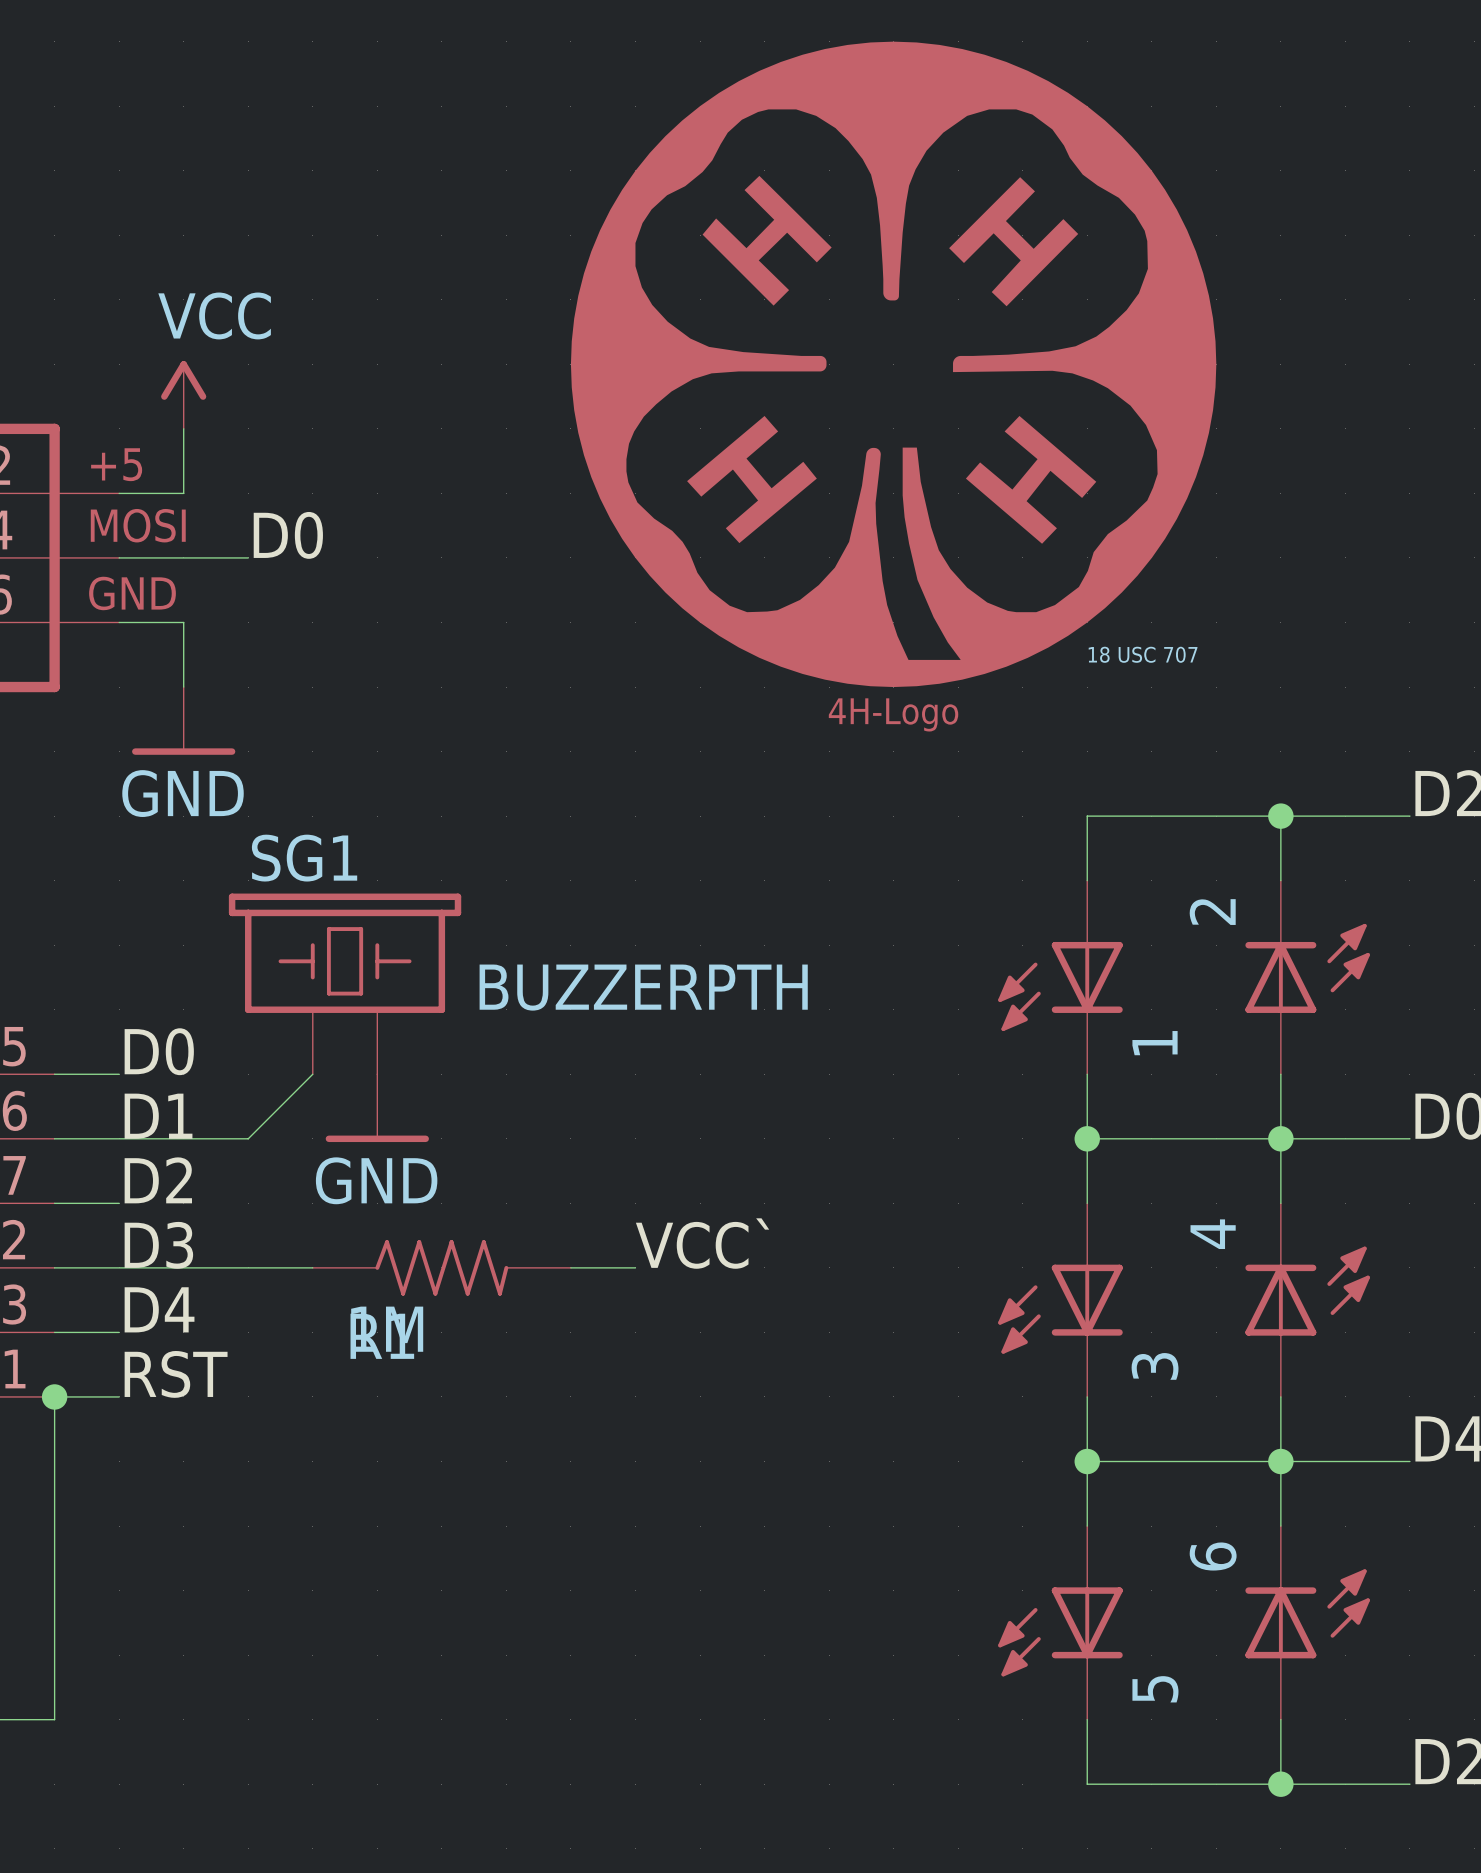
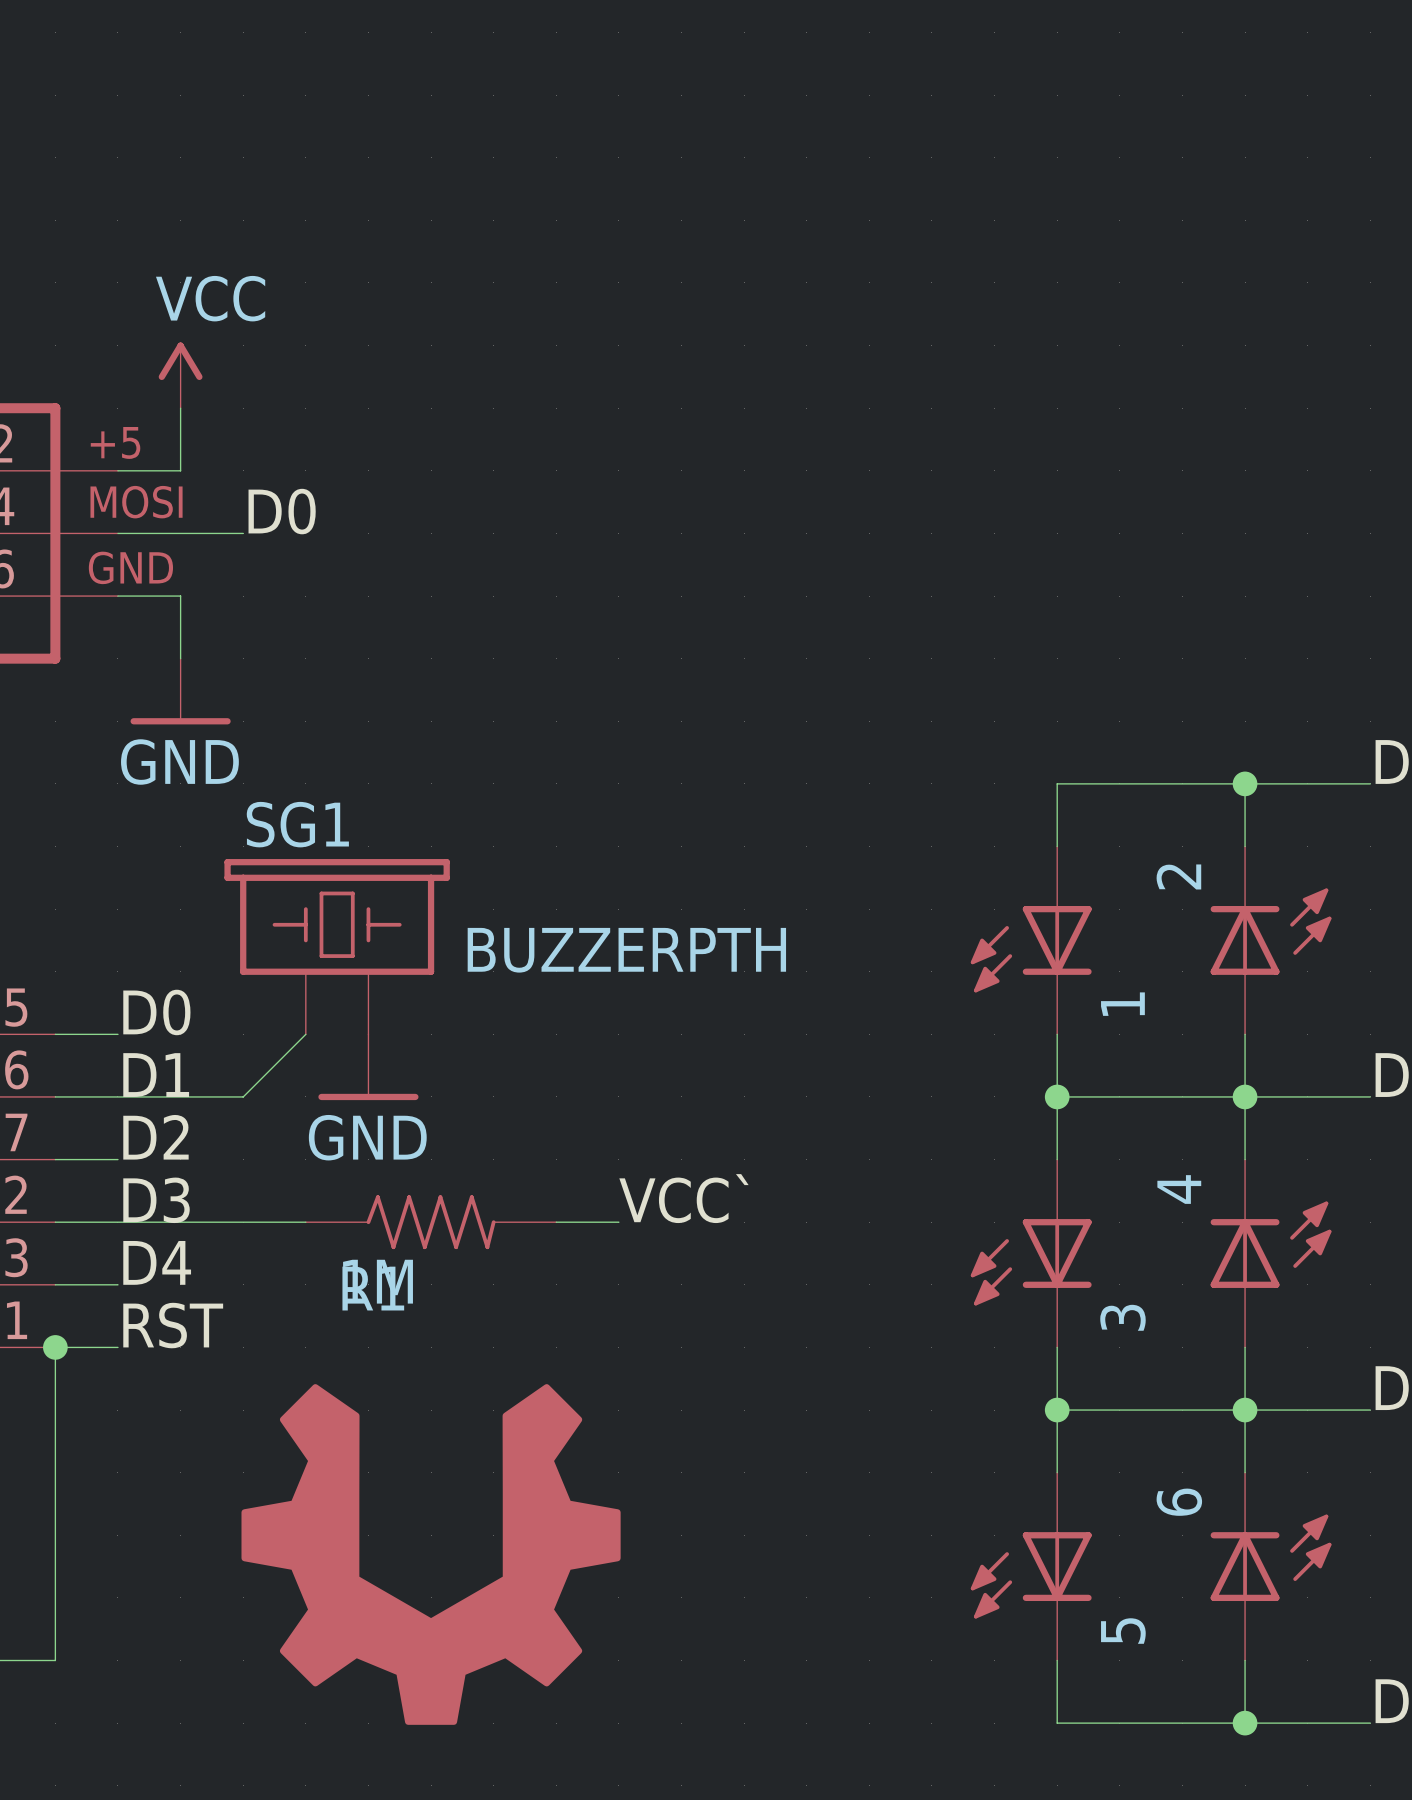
part: 18 USC 707 (893, 364) -> none
part: none -> (431, 1554)

